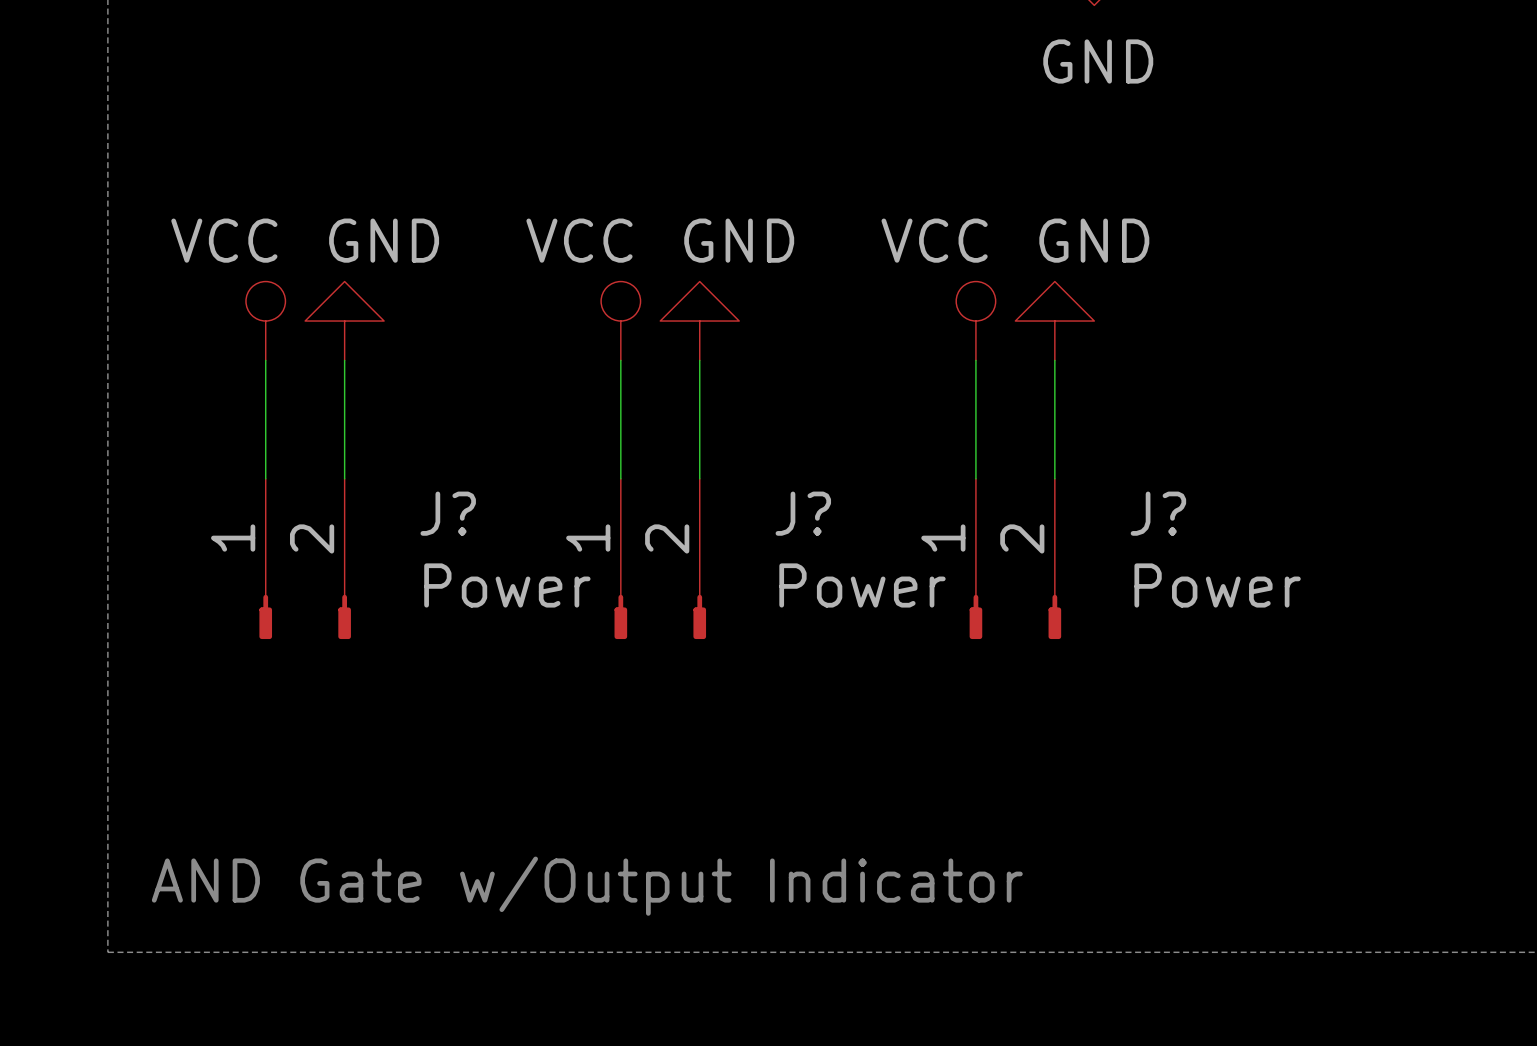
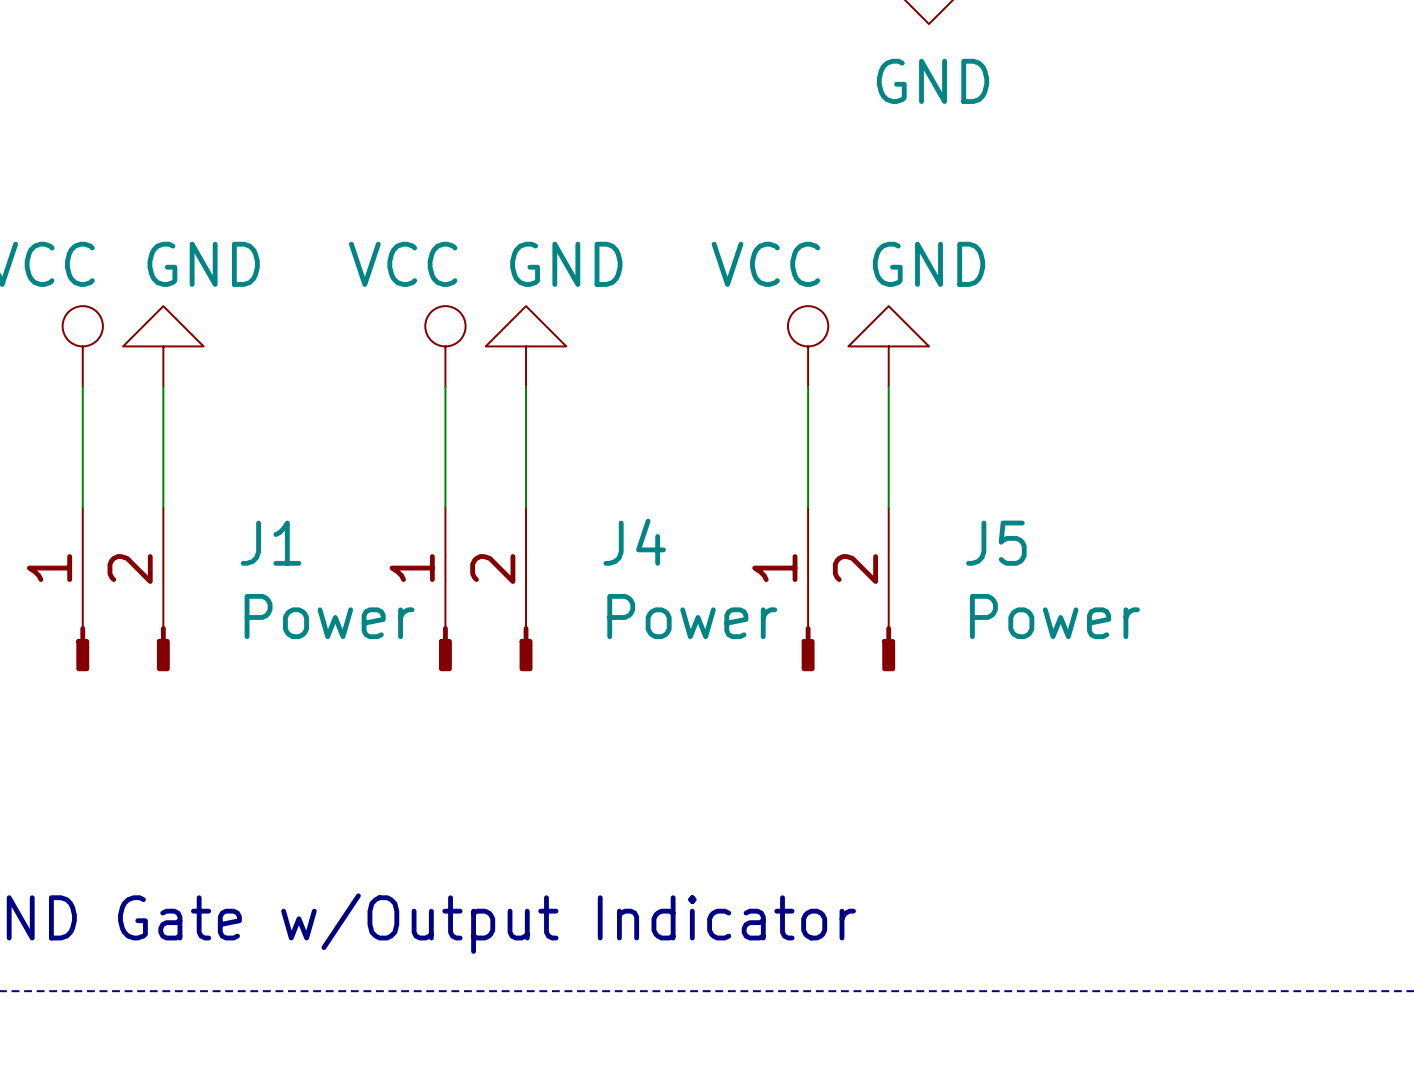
J? name: J? (448, 513) -> J1 (271, 543)
J? name: J? (803, 513) -> J4 (634, 542)
J? name: J? (1158, 513) -> J5 (996, 543)

